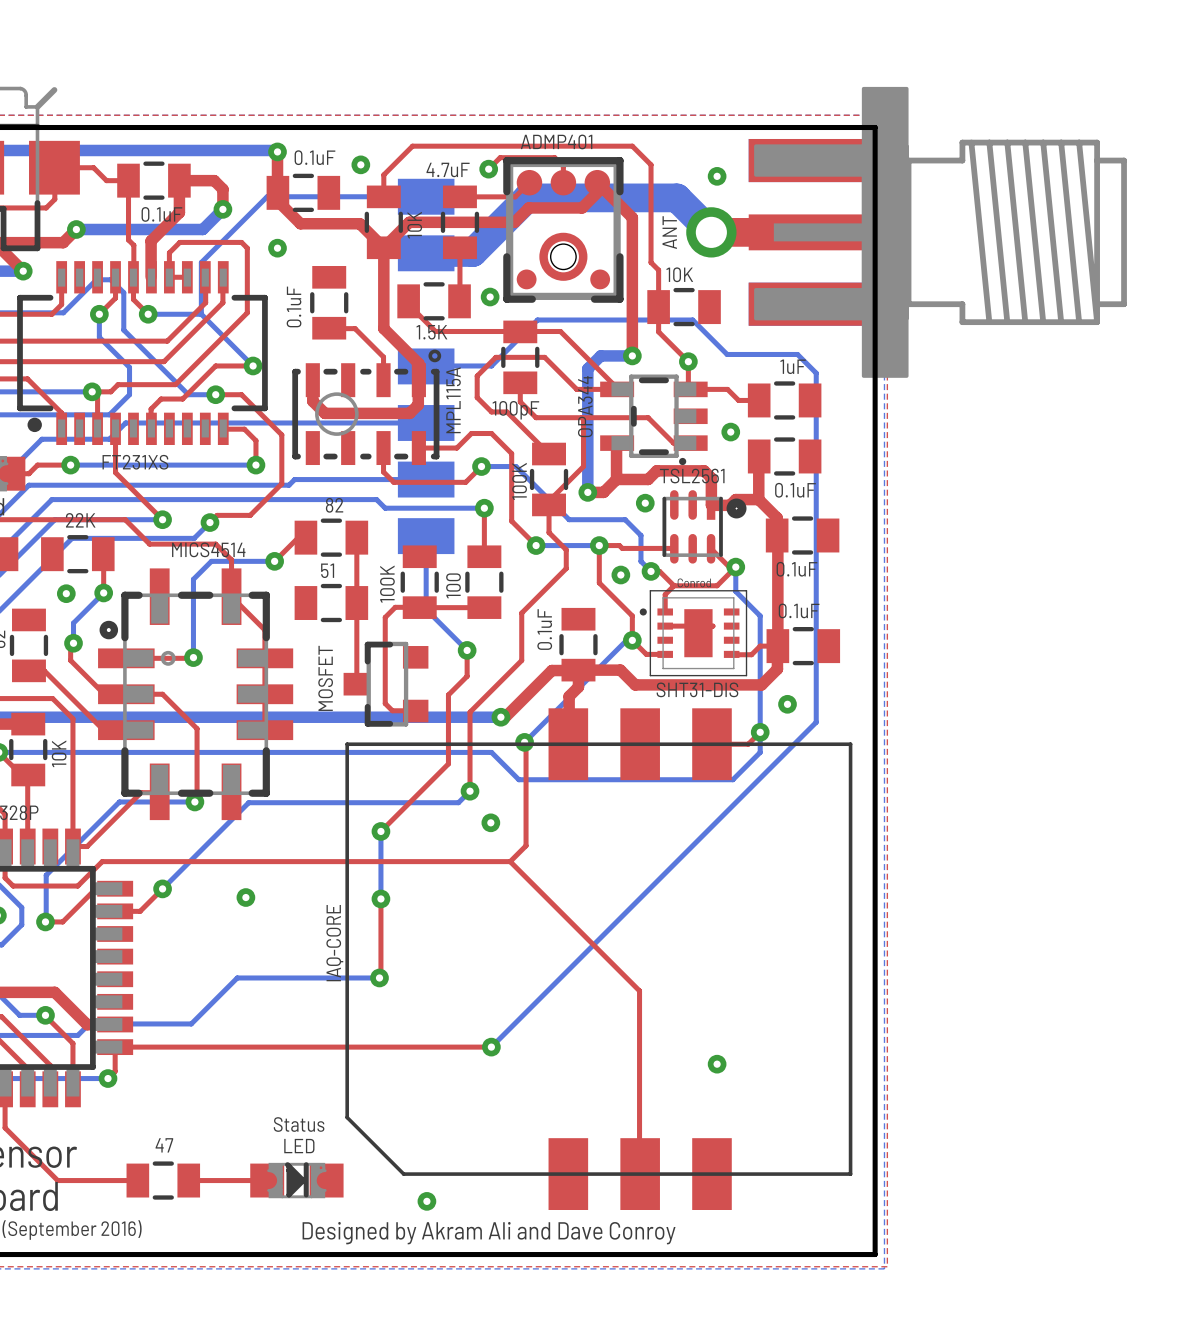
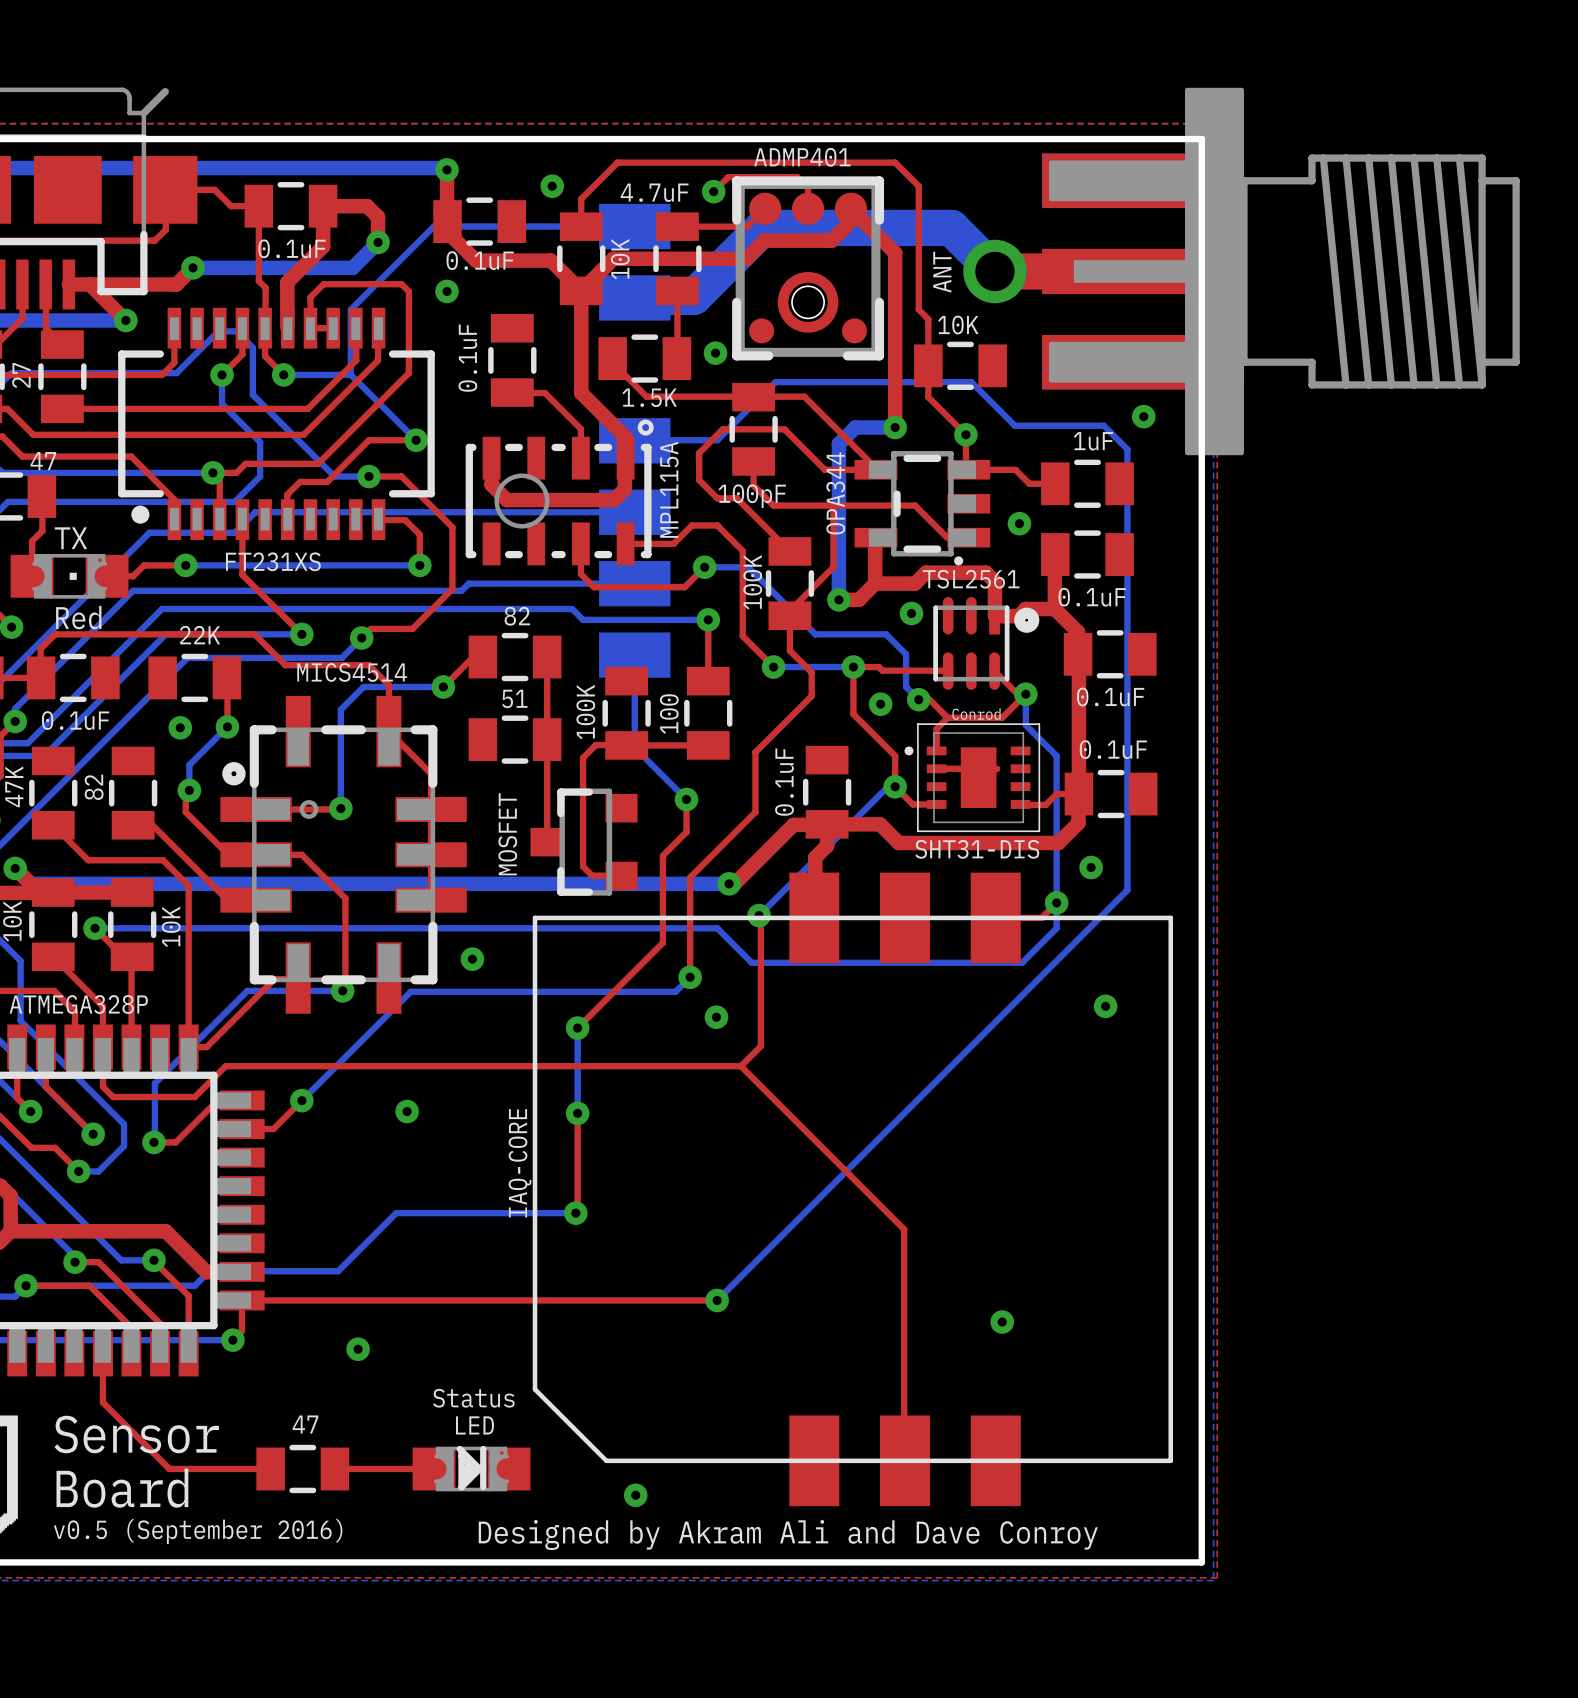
part value position: 0.1uF (314, 157) -> 0.1uF (480, 260)
via: (717, 176) -> none
via: none -> (1143, 416)
via: none -> (472, 959)
via: none -> (1105, 1006)
via: none -> (358, 1349)

